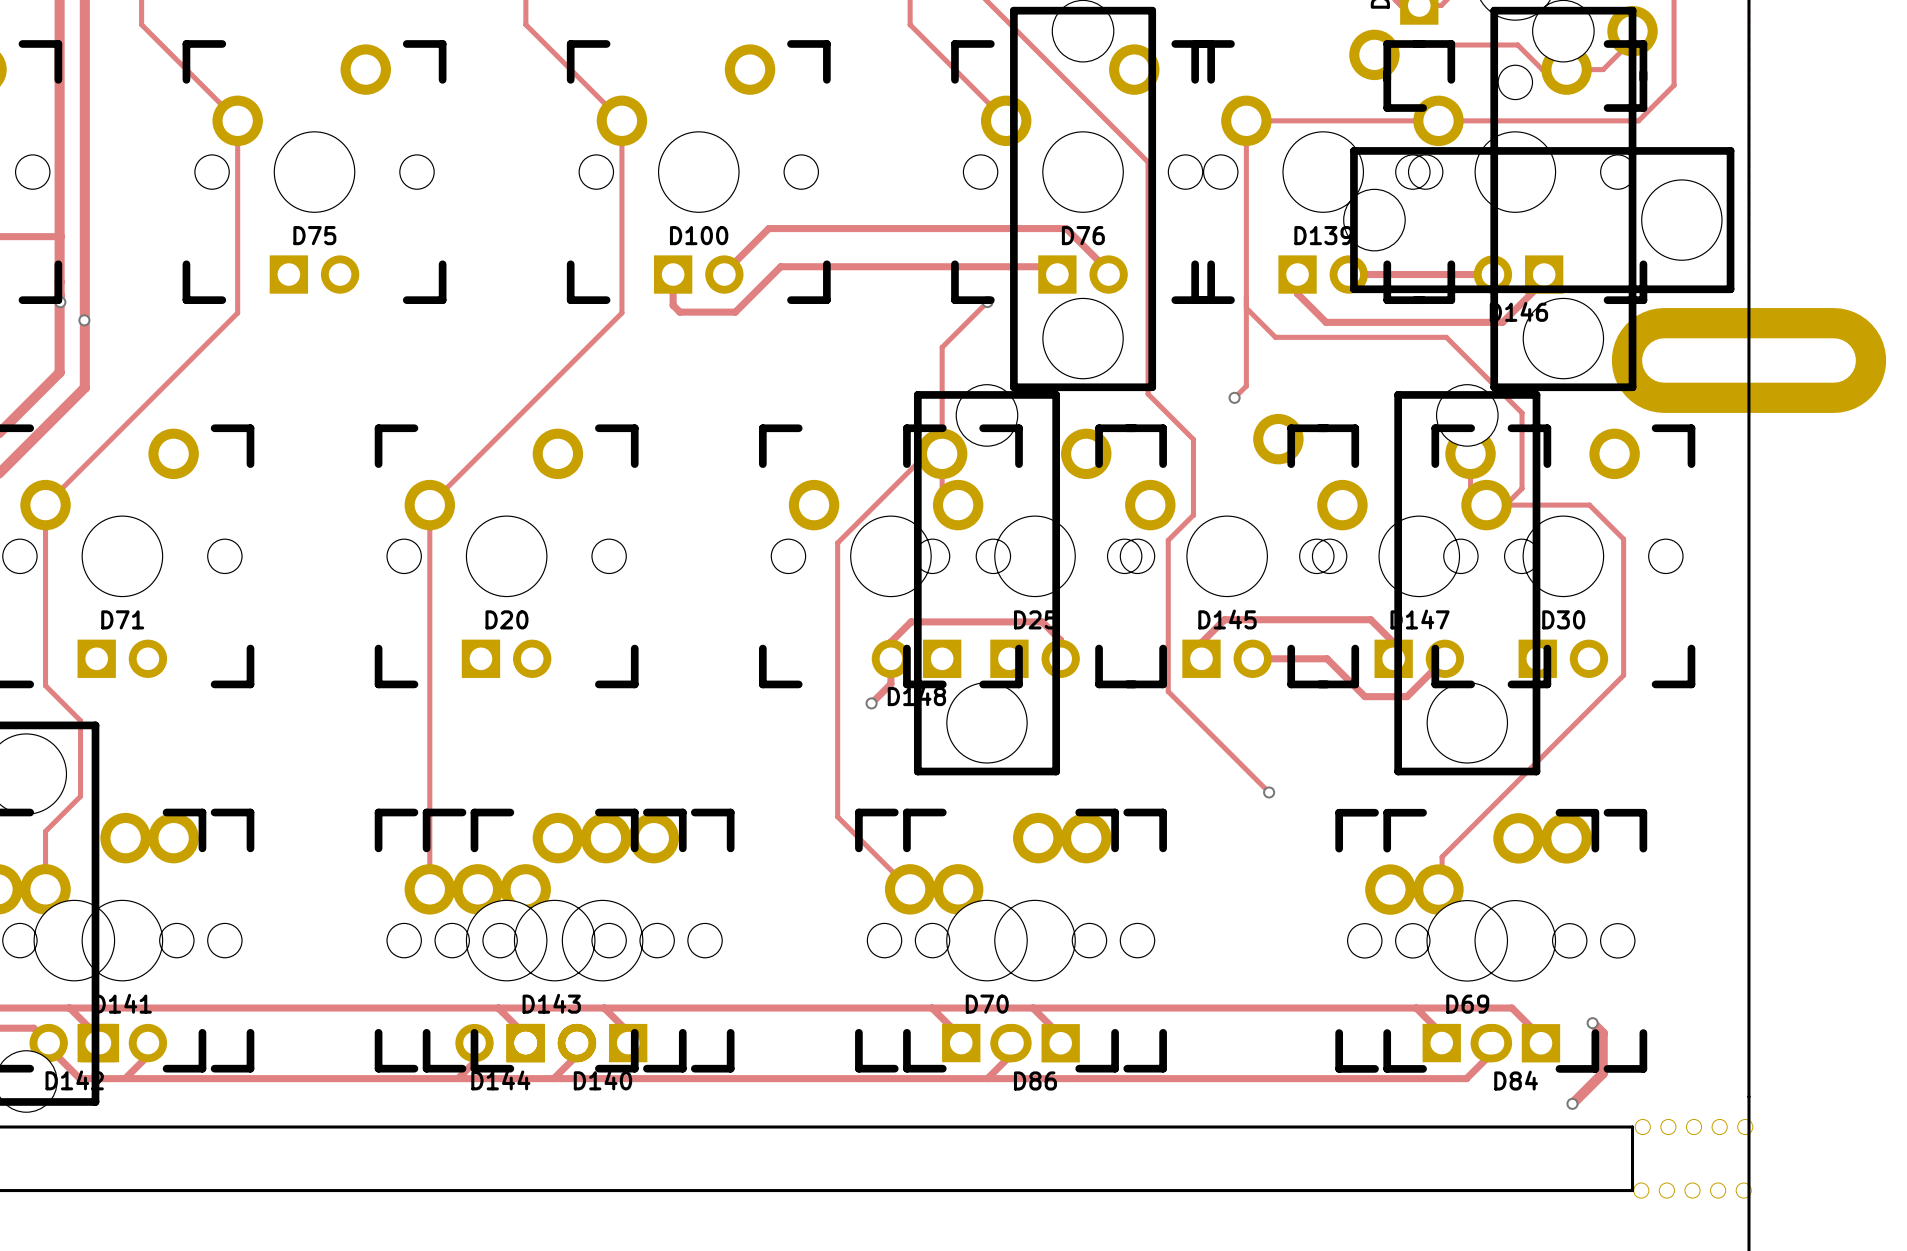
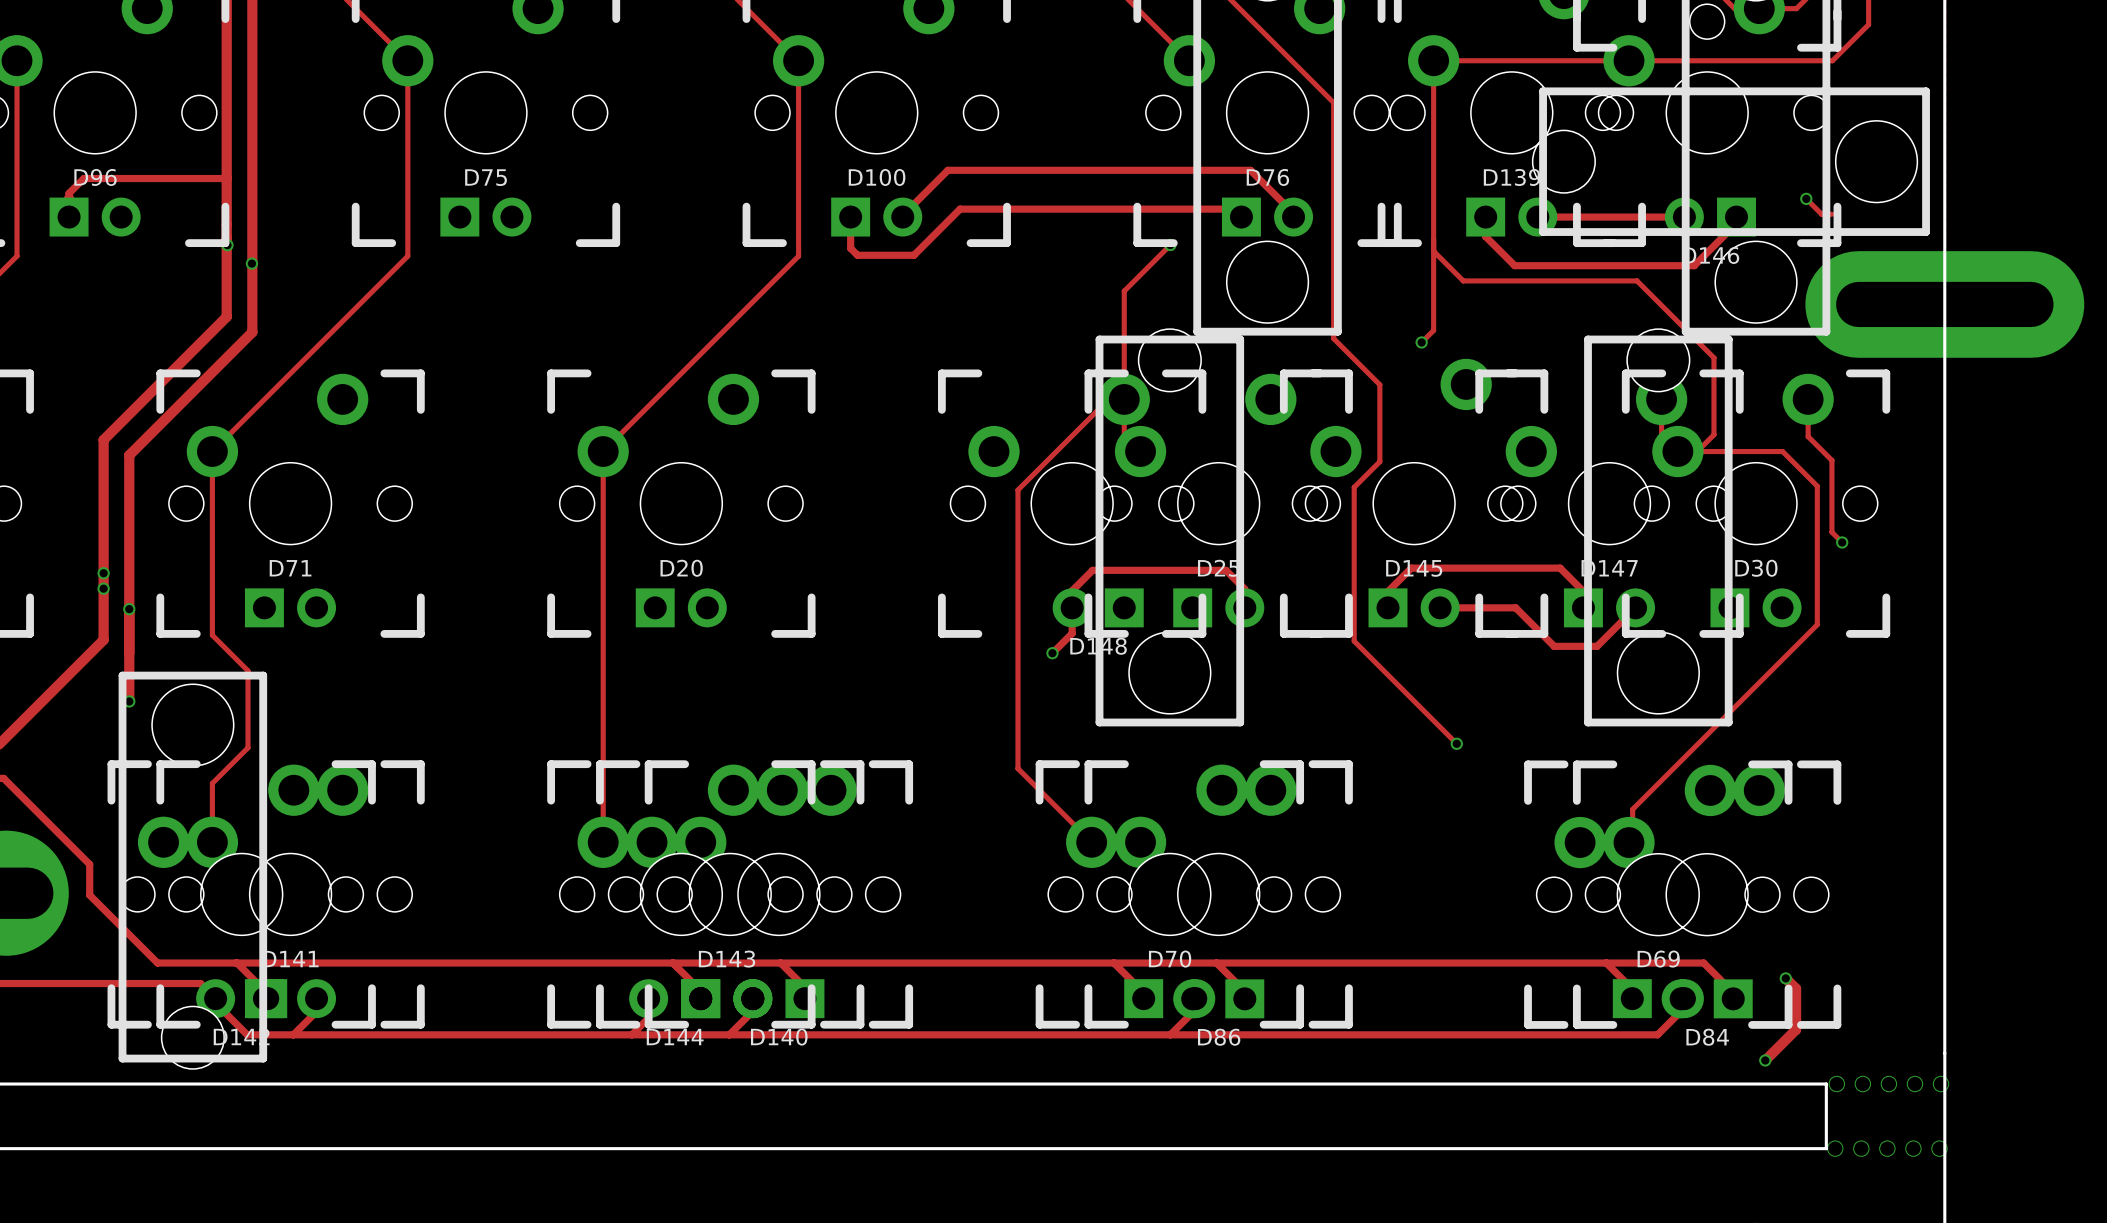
track: none -> (1806, 198) (1821, 214) (1831, 214)
via: none -> (1806, 198)
track: none -> (1808, 399) (1808, 436) (1831, 460) (1831, 532) (1842, 542)
via: none -> (1842, 542)

